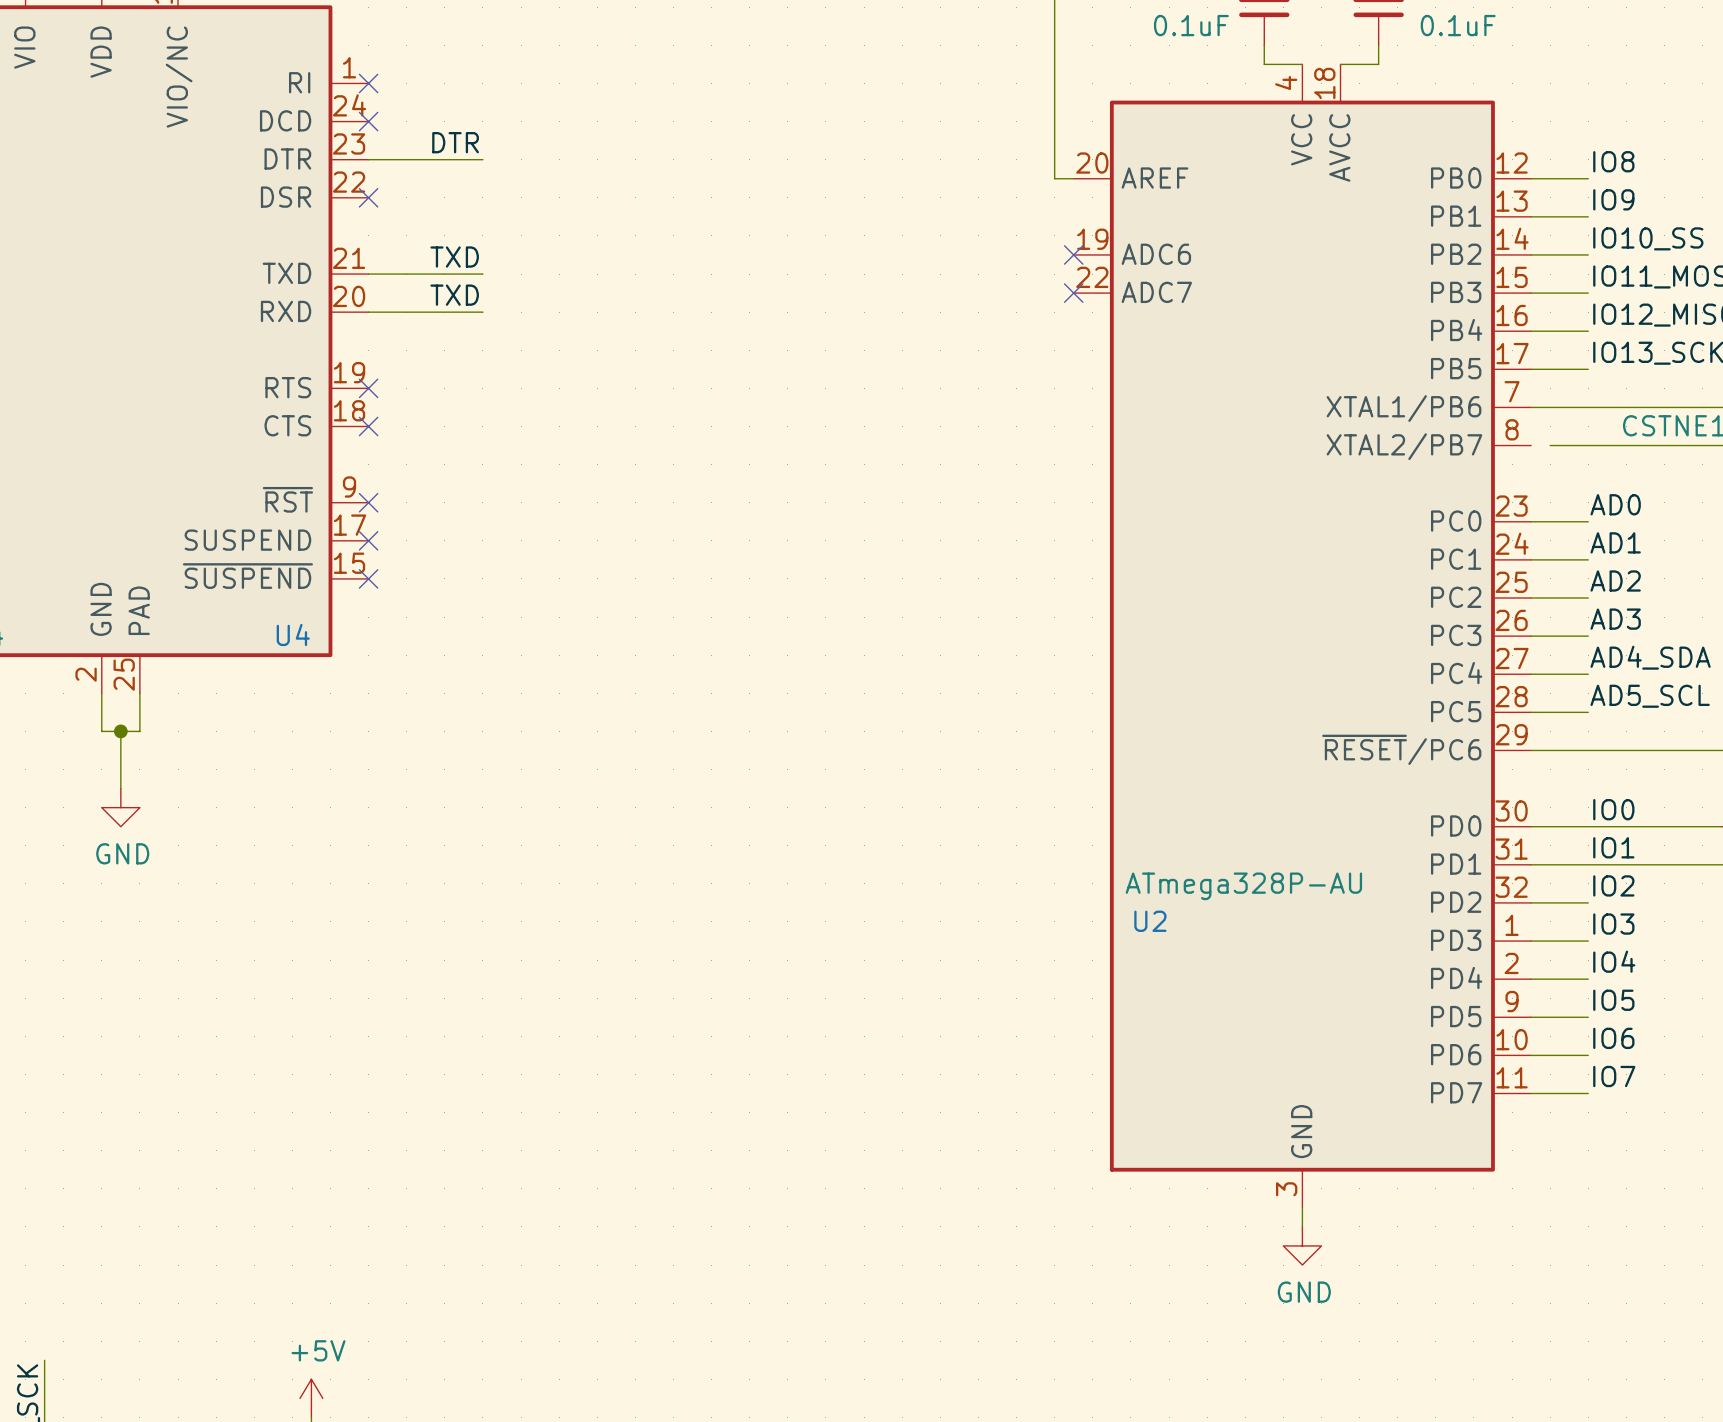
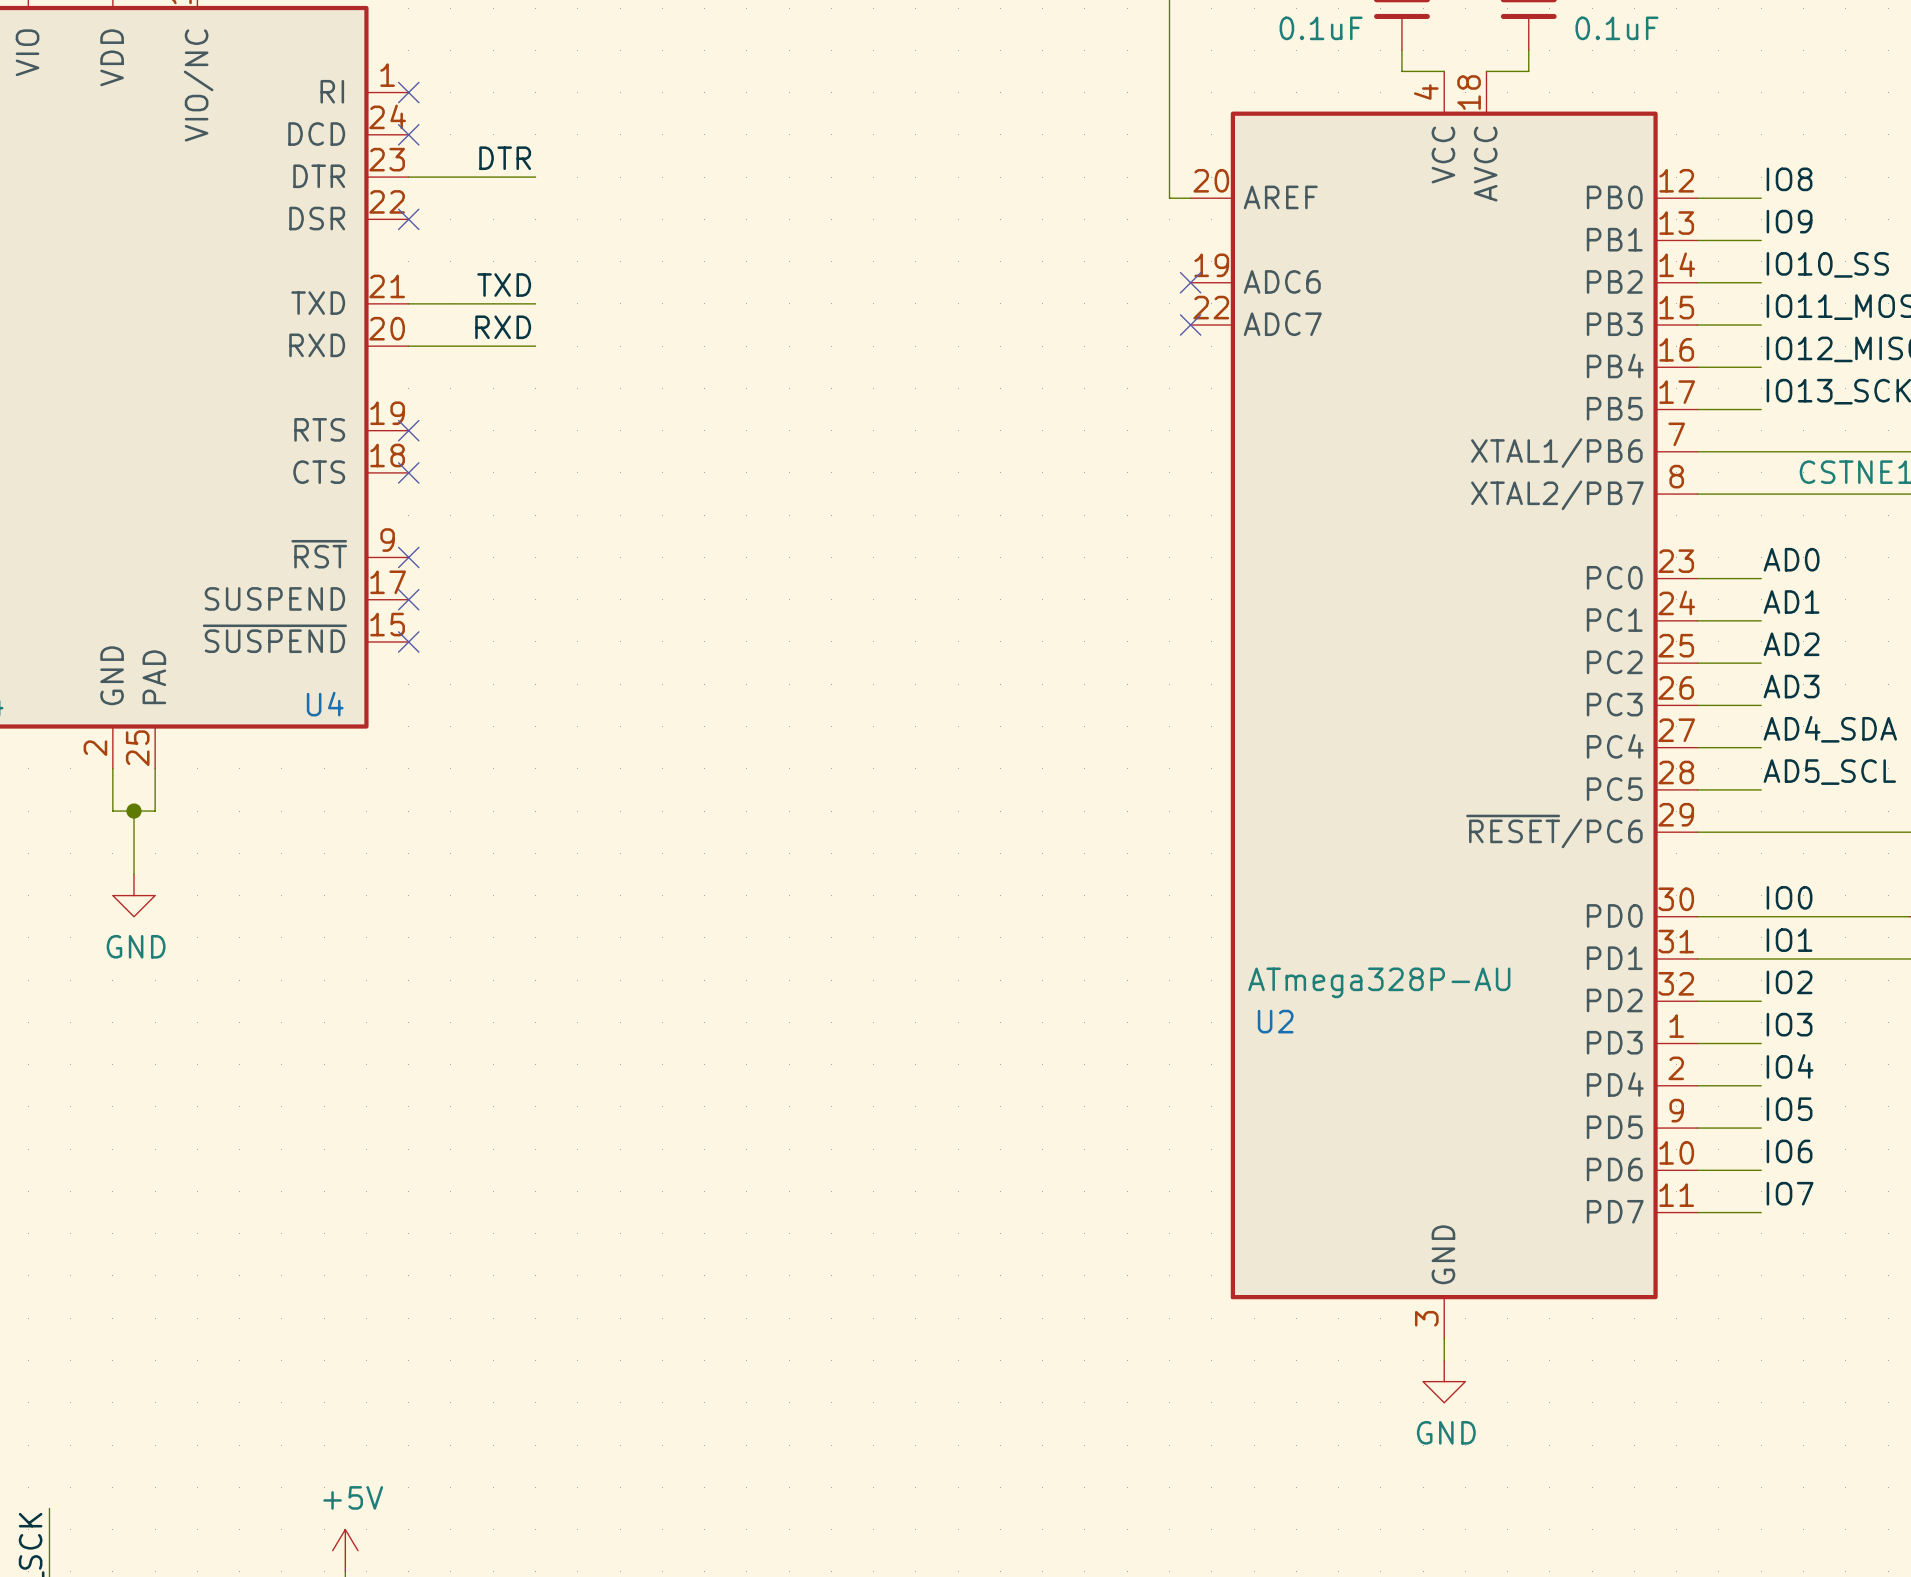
label: TXD (454, 295) -> RXD (503, 327)
wire: none -> (1697, 494) (1718, 494)

